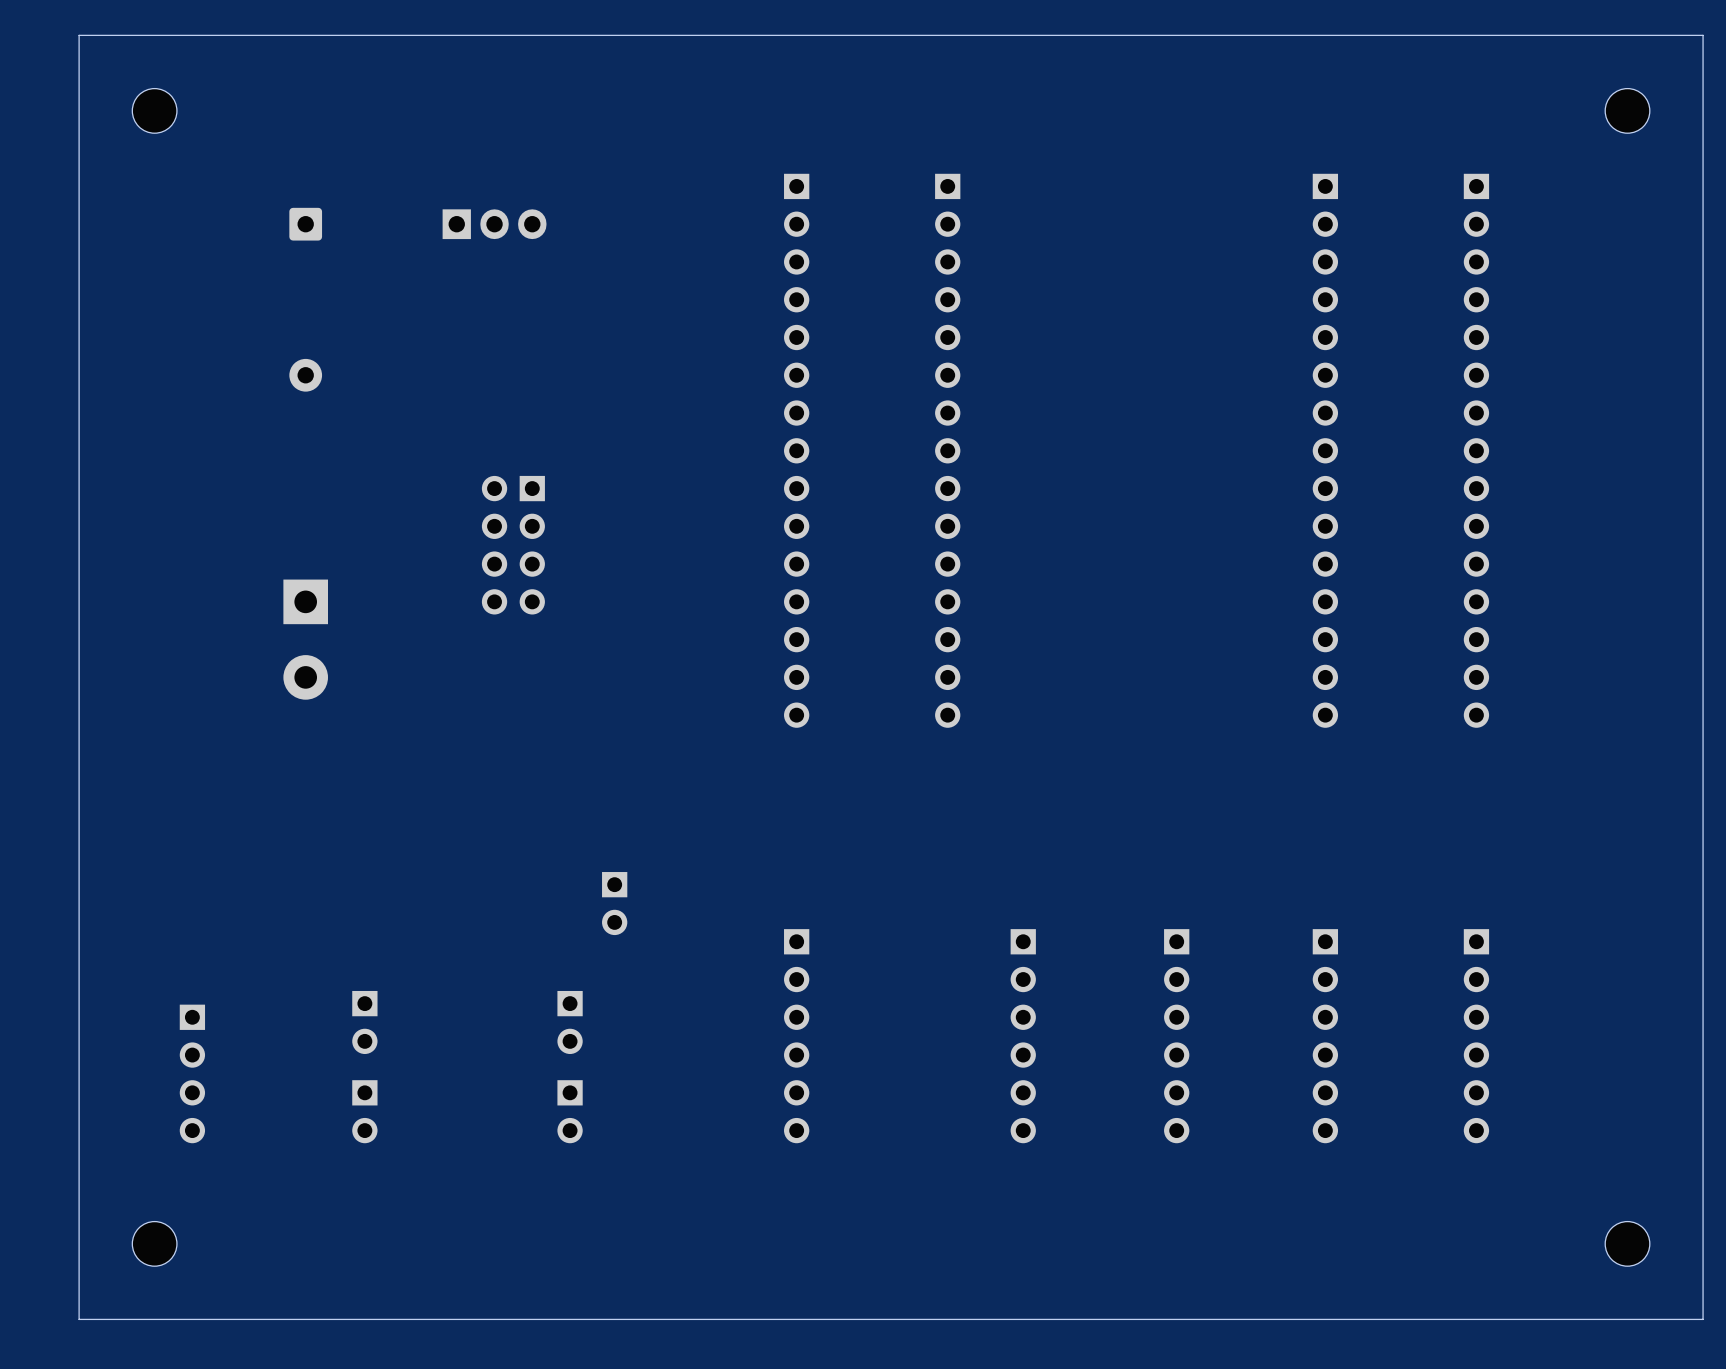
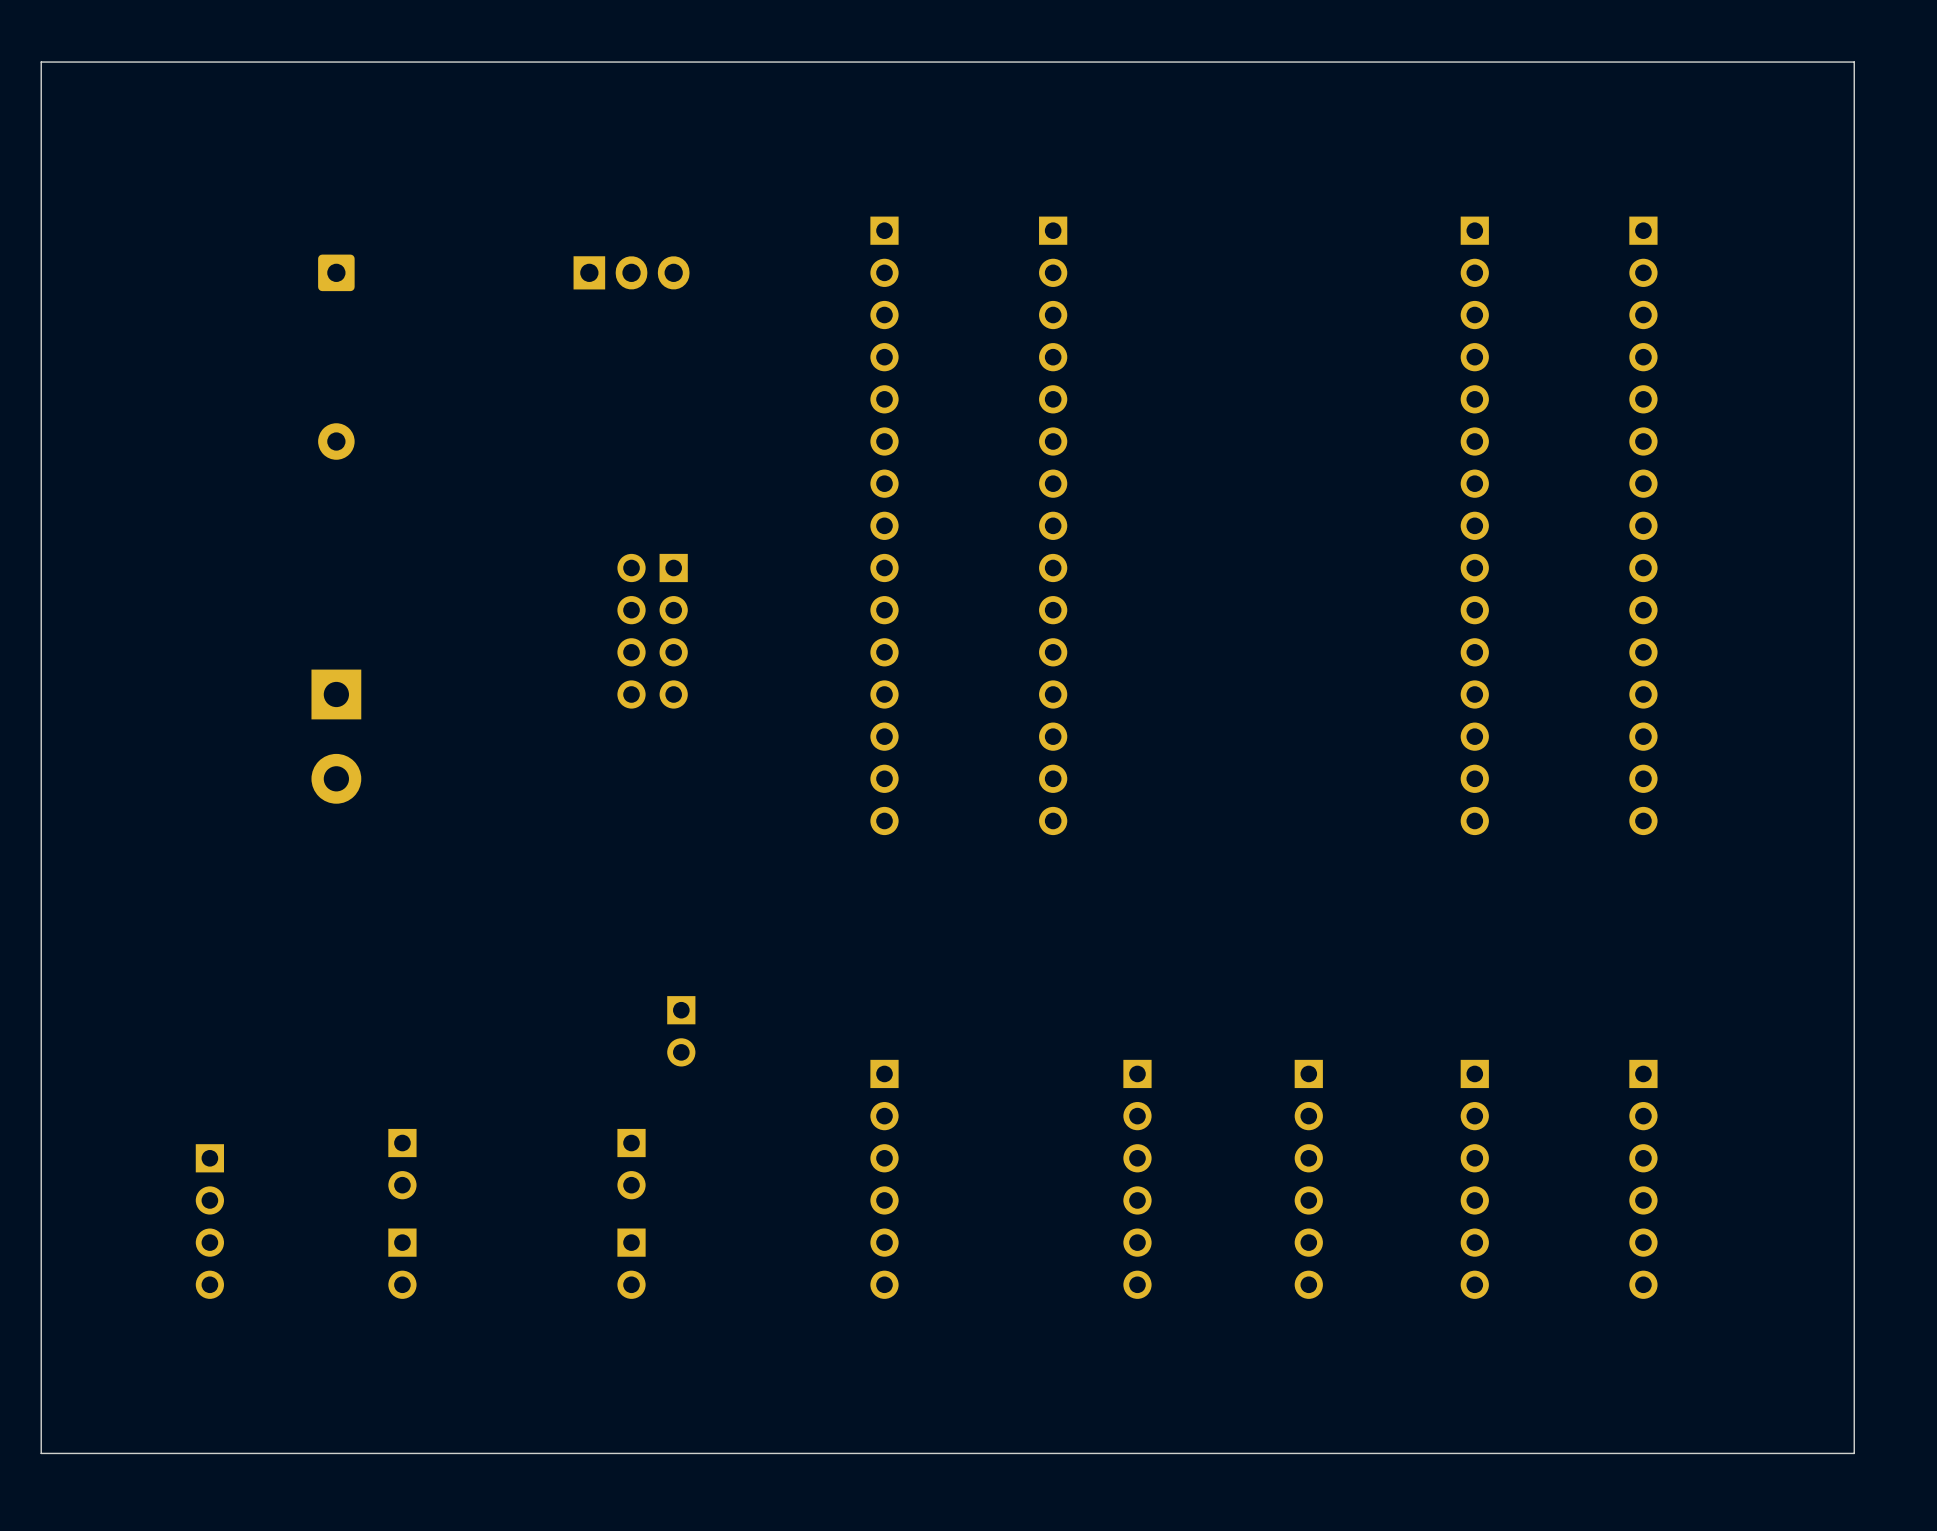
board edge: (1665, 35) (1703, 35) (1703, 1319) (79, 1319) (79, 35) -> (1854, 62) (1854, 1453) (41, 1453) (41, 62) (83, 62)
part: (154, 110) -> none
part: (1627, 110) -> none
part position: (494, 224) -> (631, 272)
part position: (513, 545) -> (652, 631)
part: (154, 1243) -> none
part: (1627, 1243) -> none

